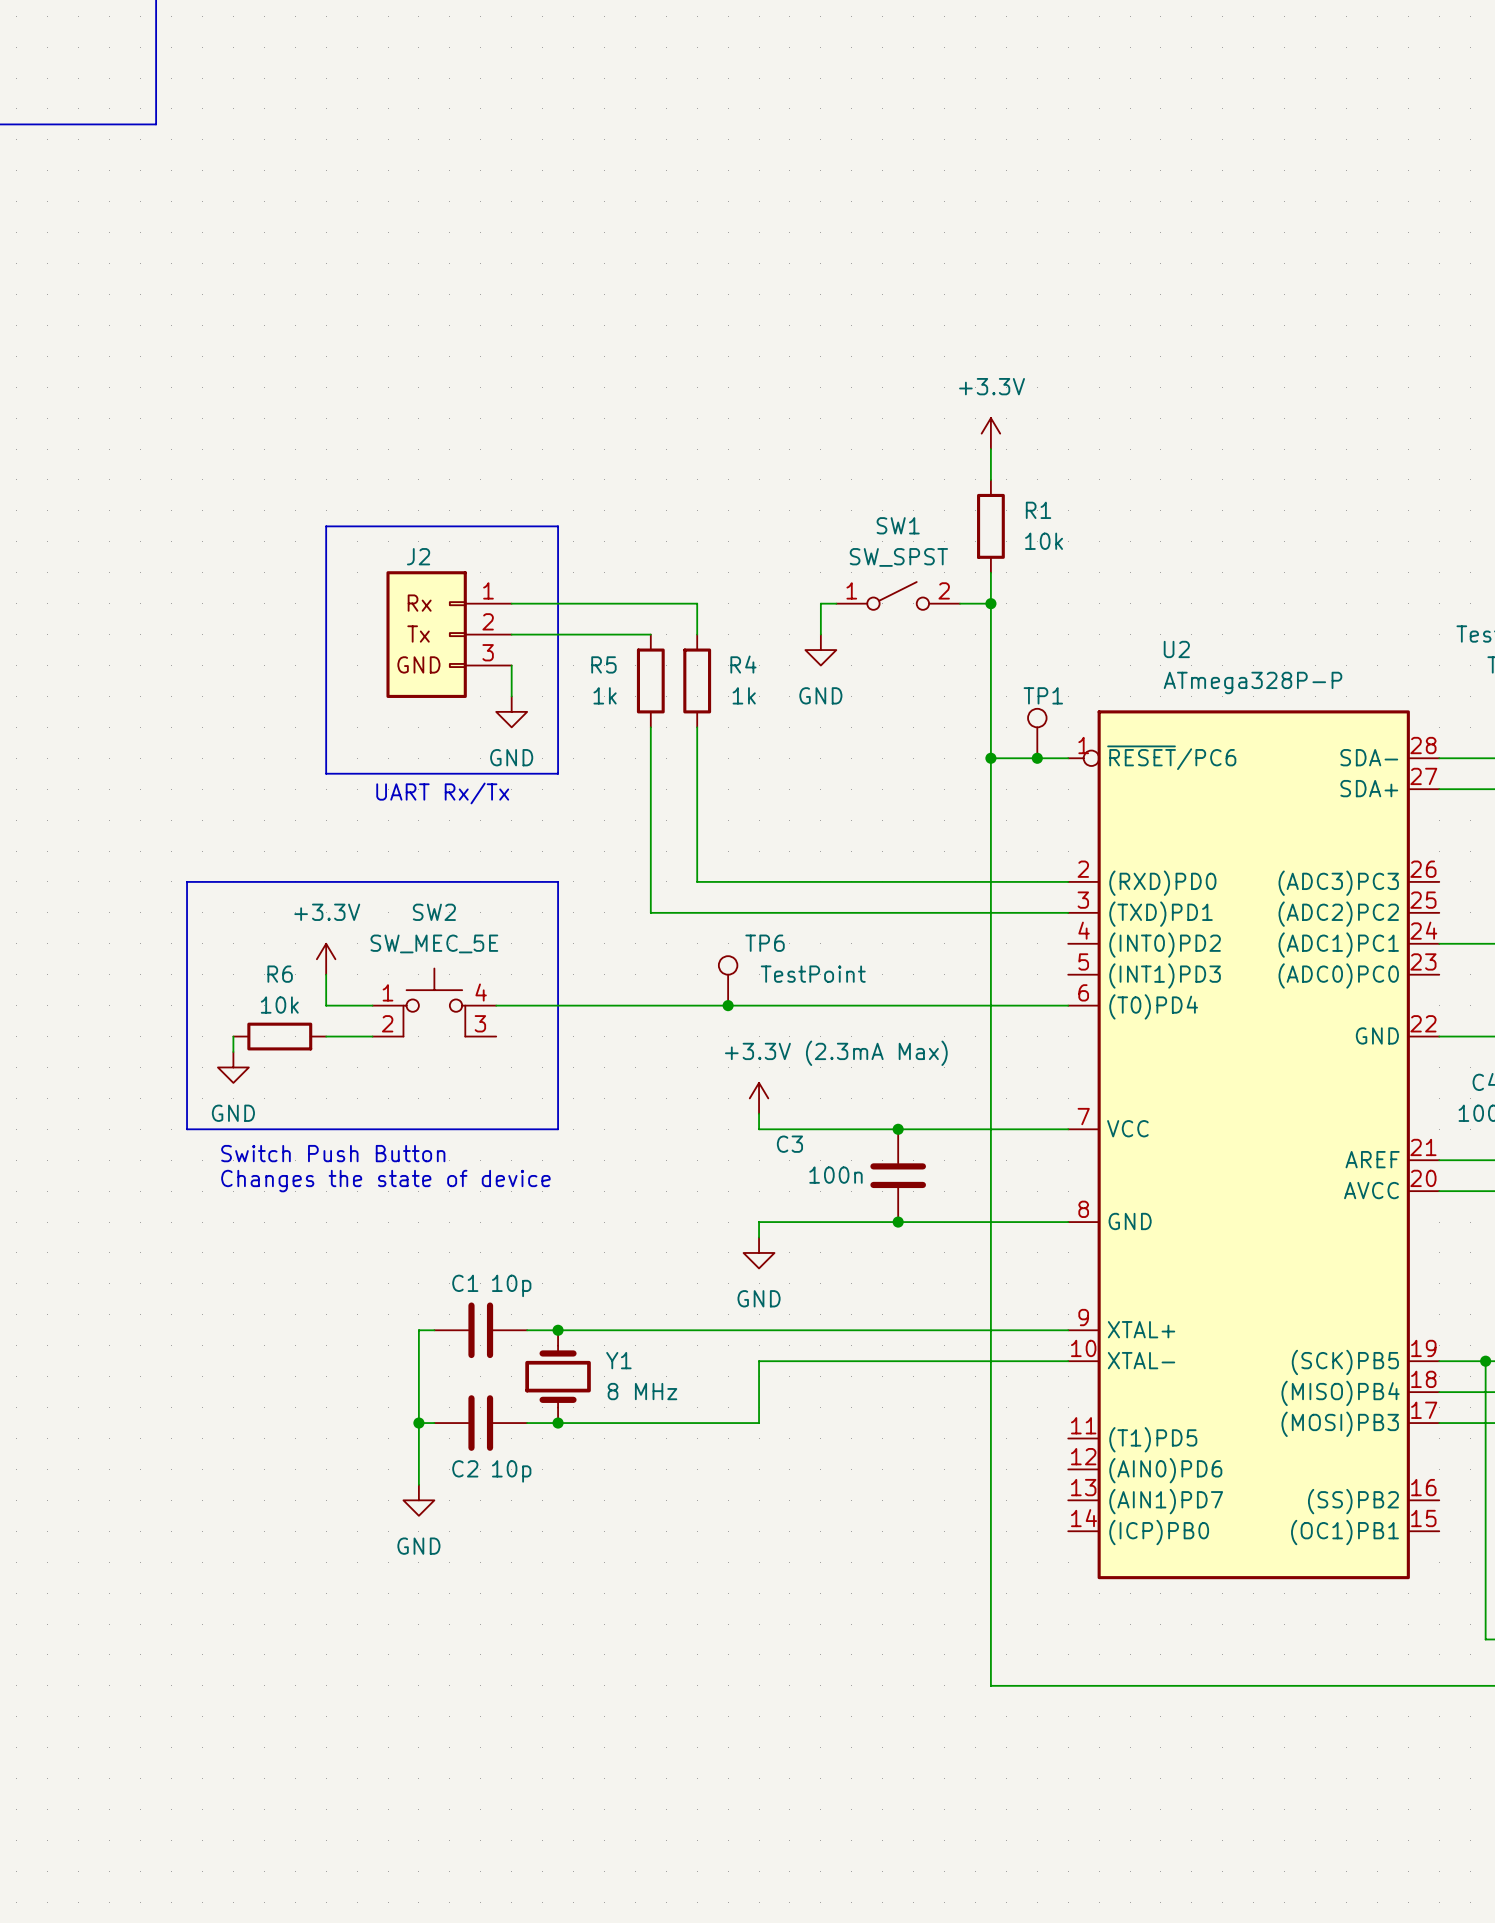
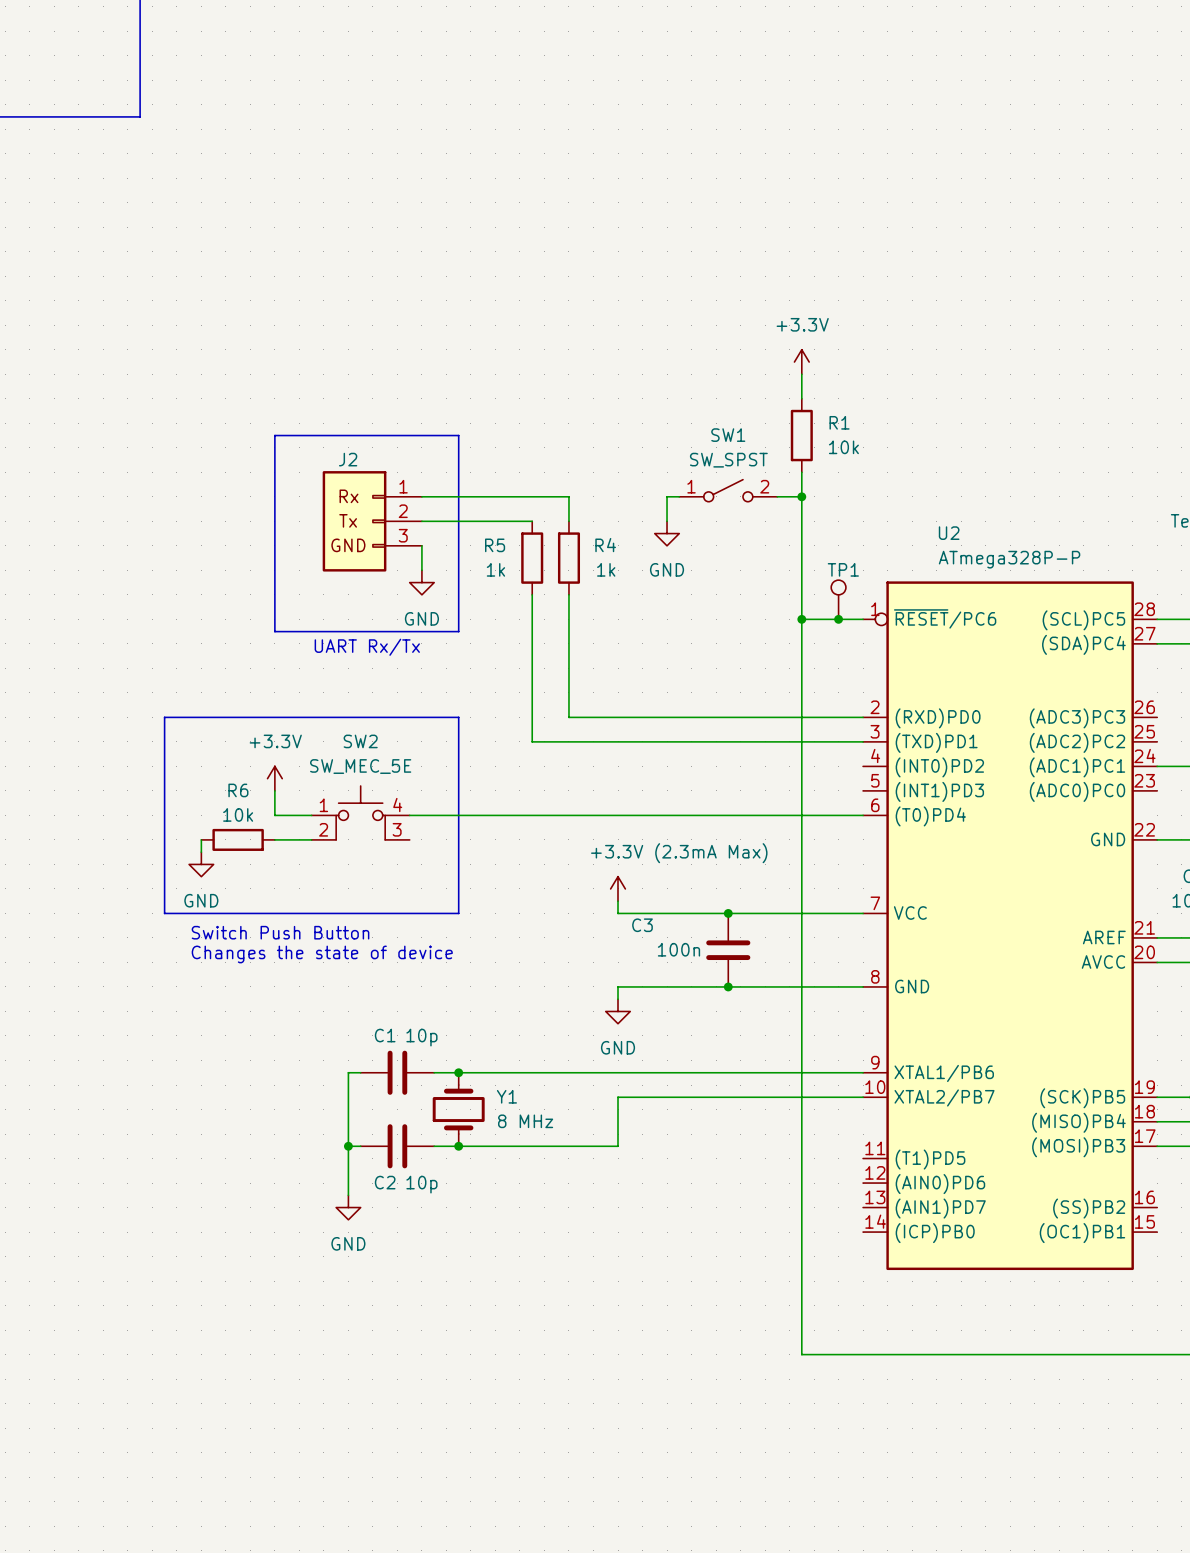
U2 pin name: SDA- (1369, 757) -> (SCL)PC5 (1083, 620)
U2 pin name: SDA+ (1369, 788) -> (SDA)PC4 (1083, 644)
TP6: TestPoint (728, 980) -> none
junction: (728, 1005) -> none
U2 pin name: XTAL+ (1141, 1329) -> XTAL1/PB6 (944, 1073)
U2 pin name: XTAL- (1141, 1360) -> XTAL2/PB7 (944, 1097)

